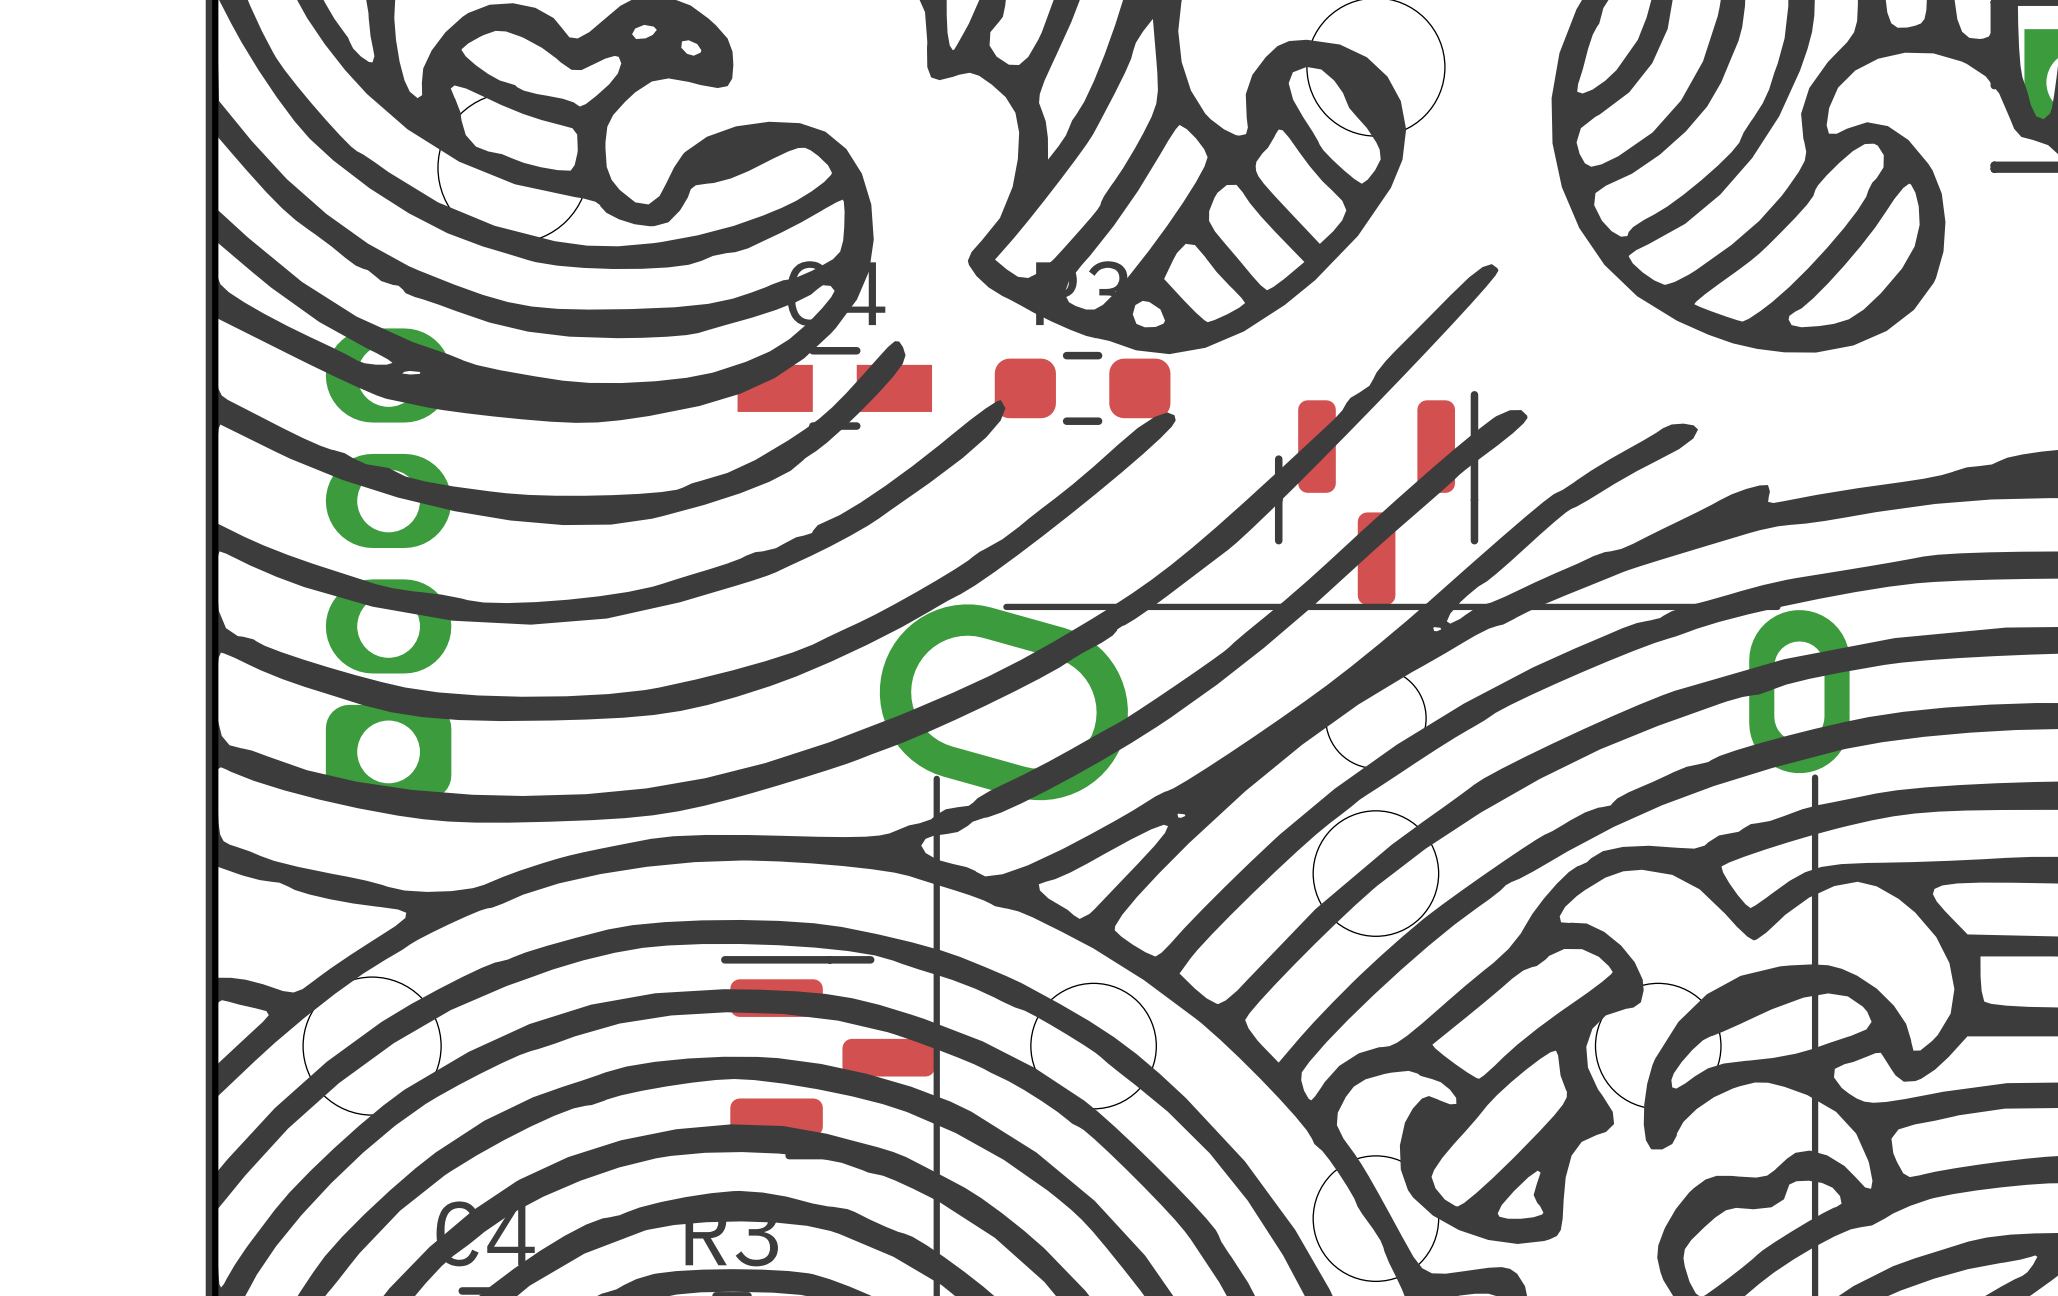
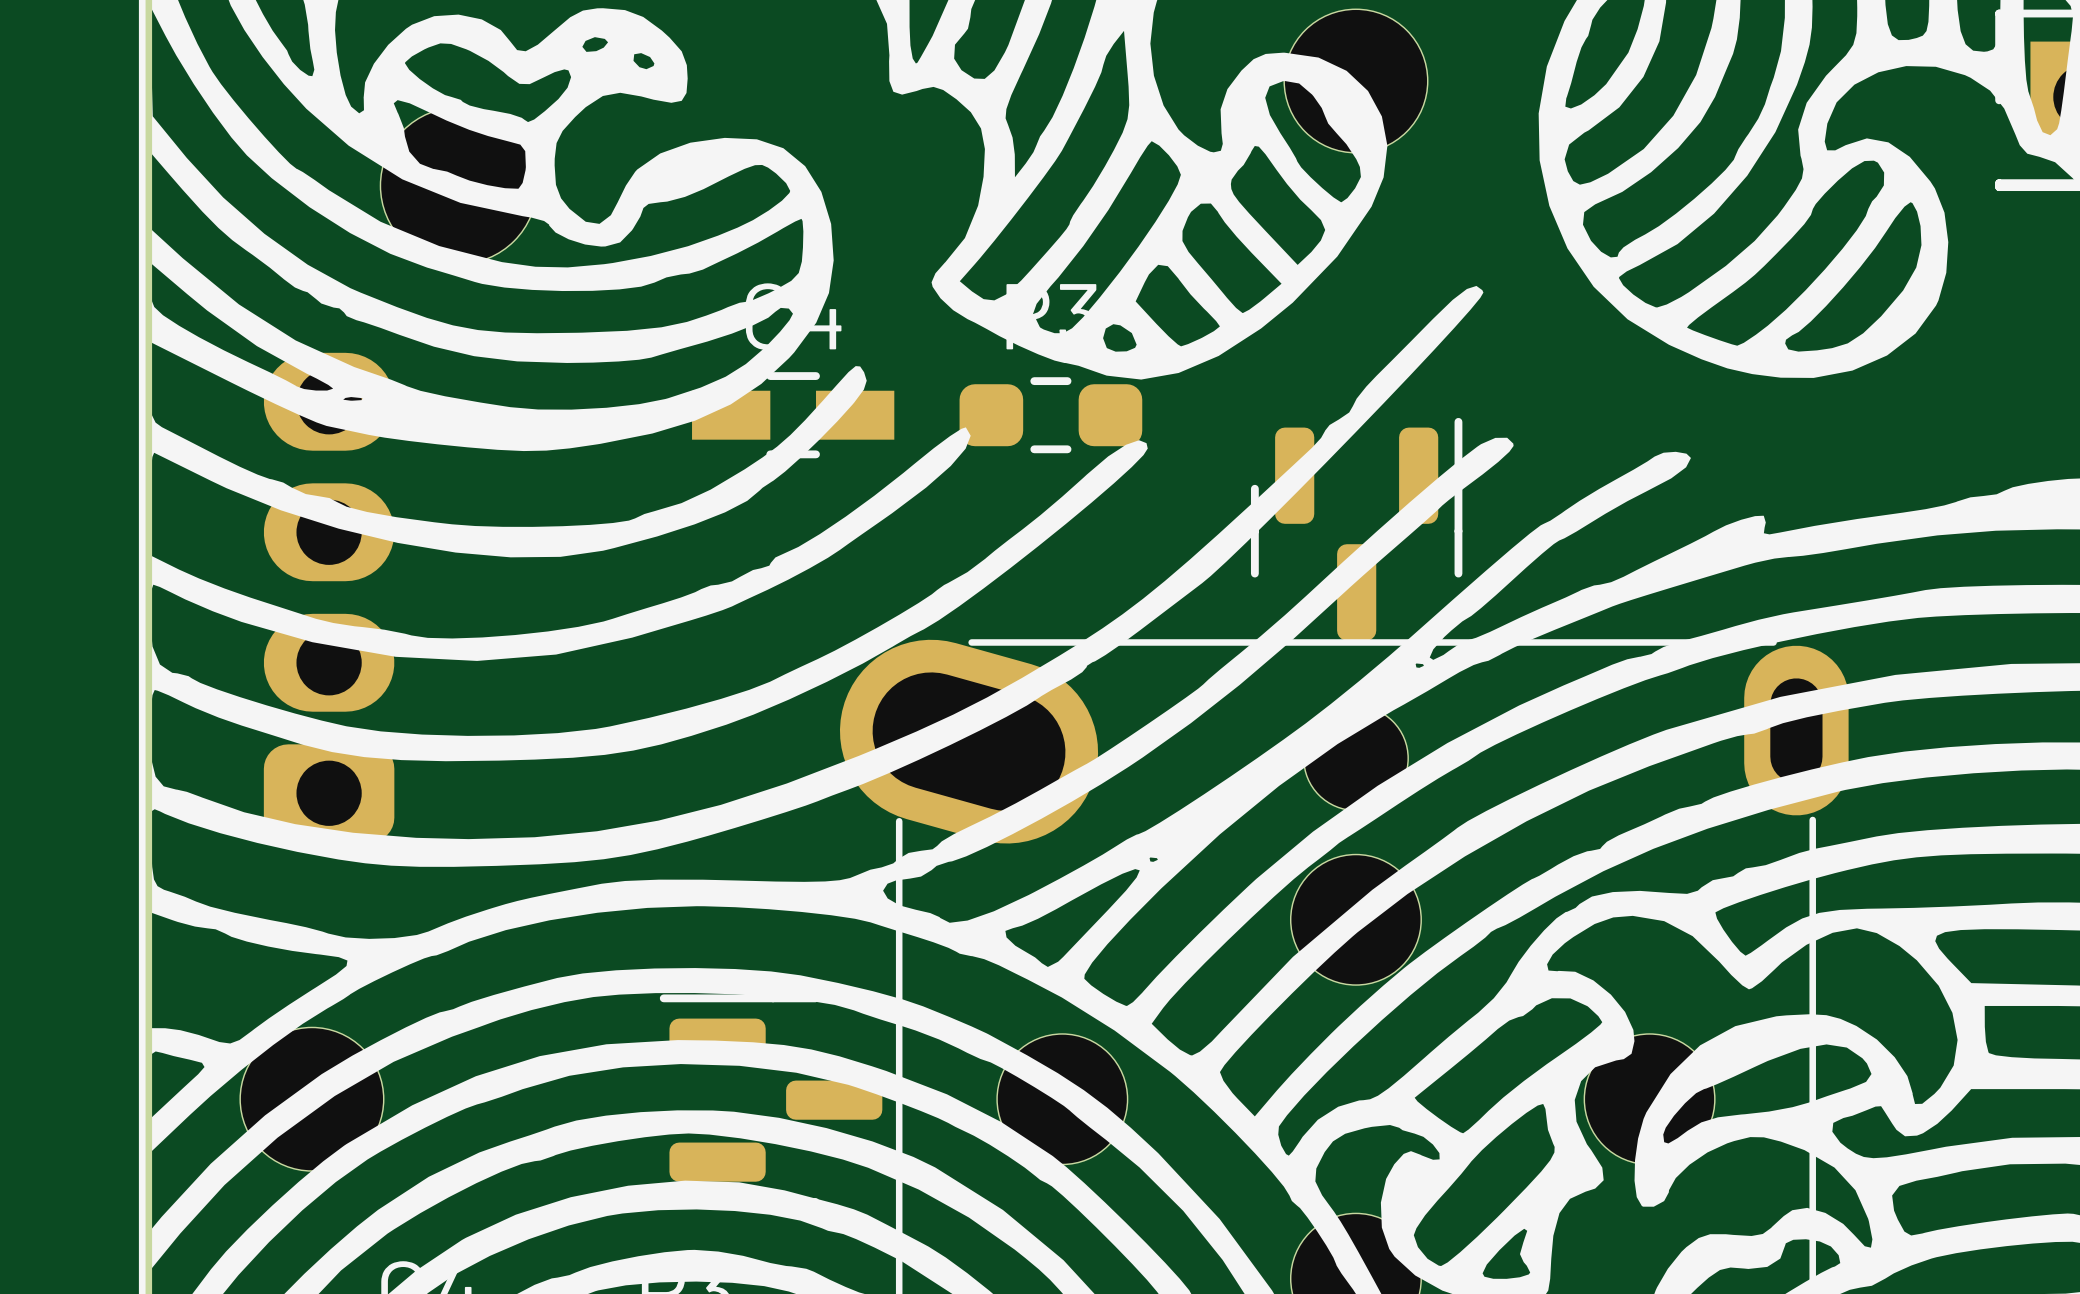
part position: (828, 1057) -> (771, 1100)

